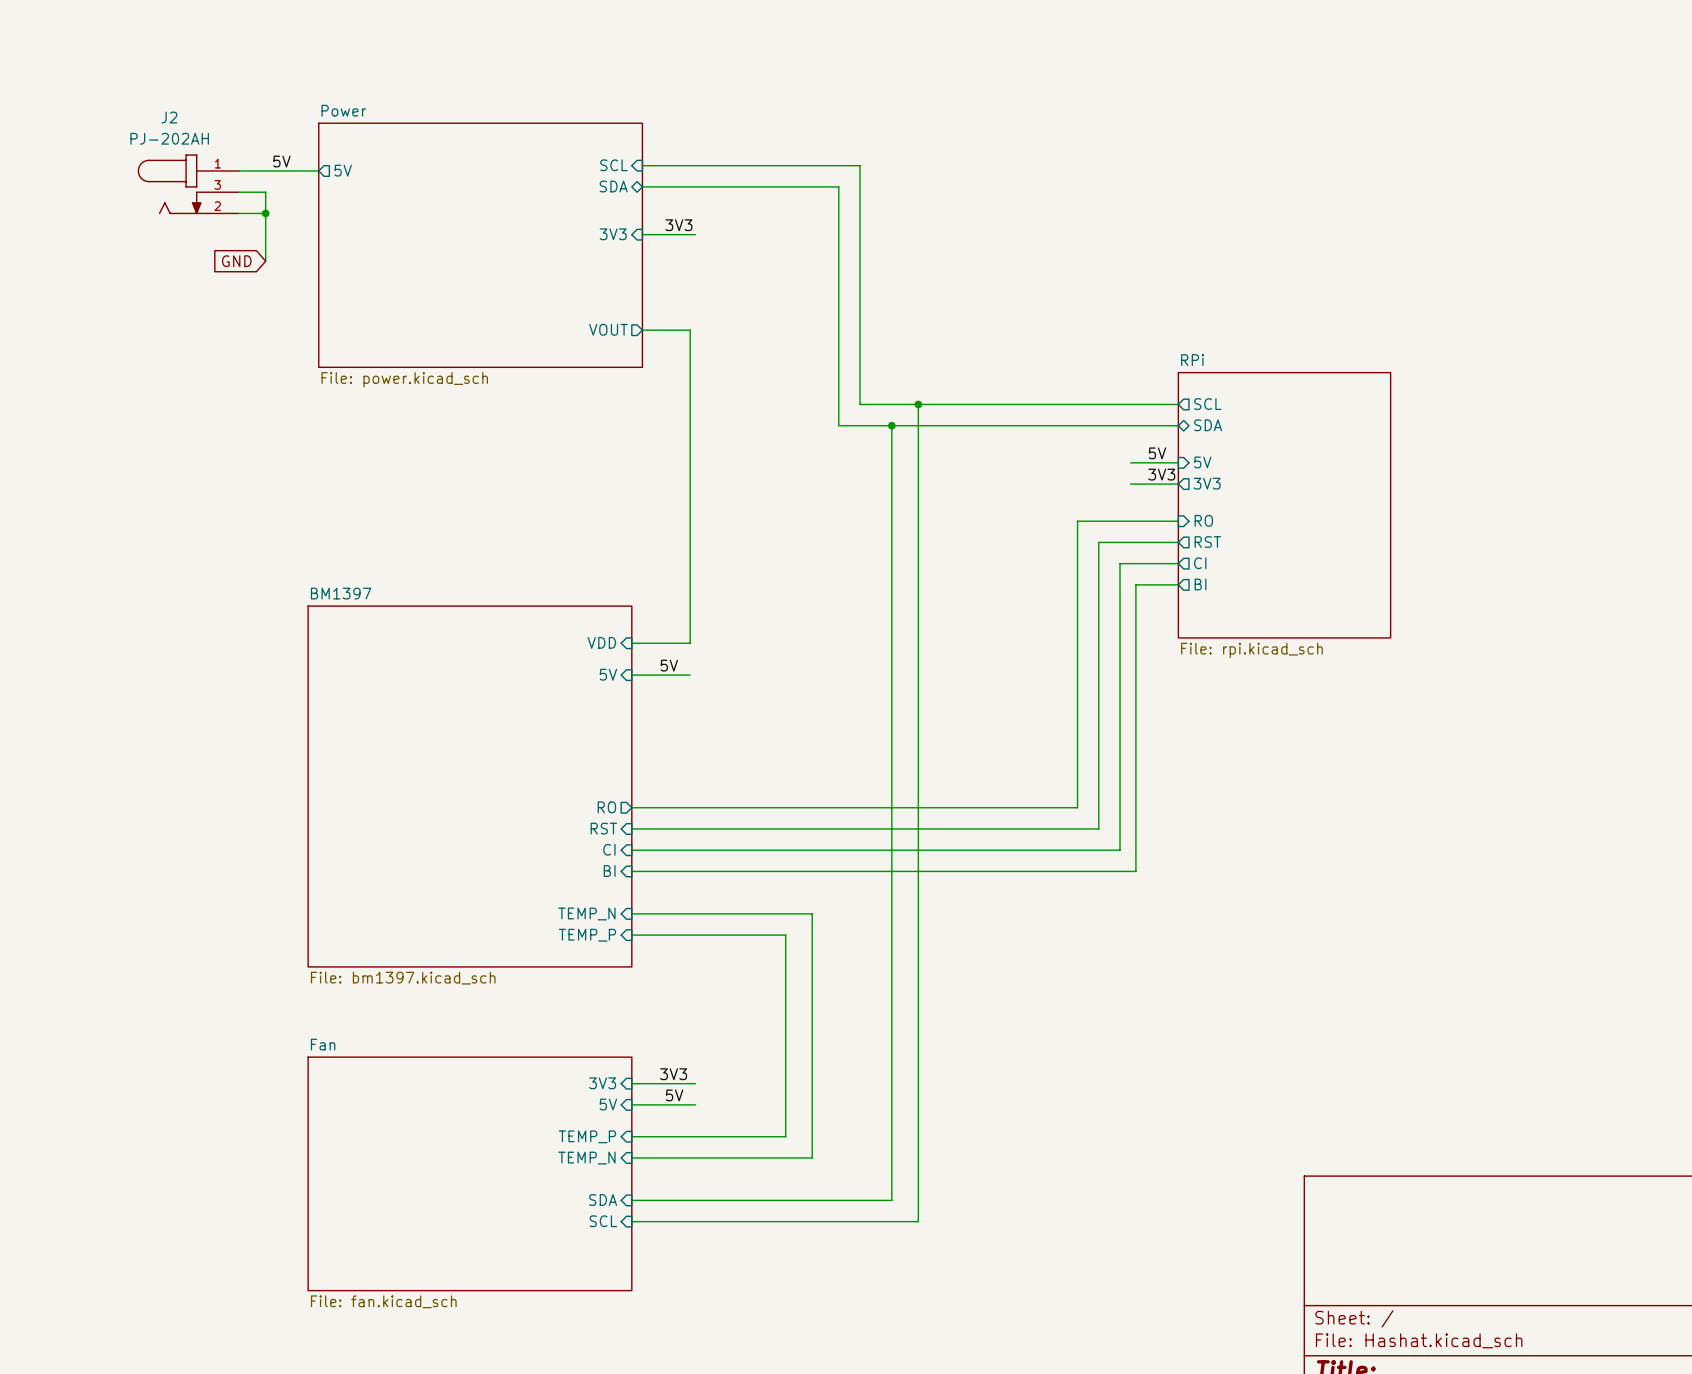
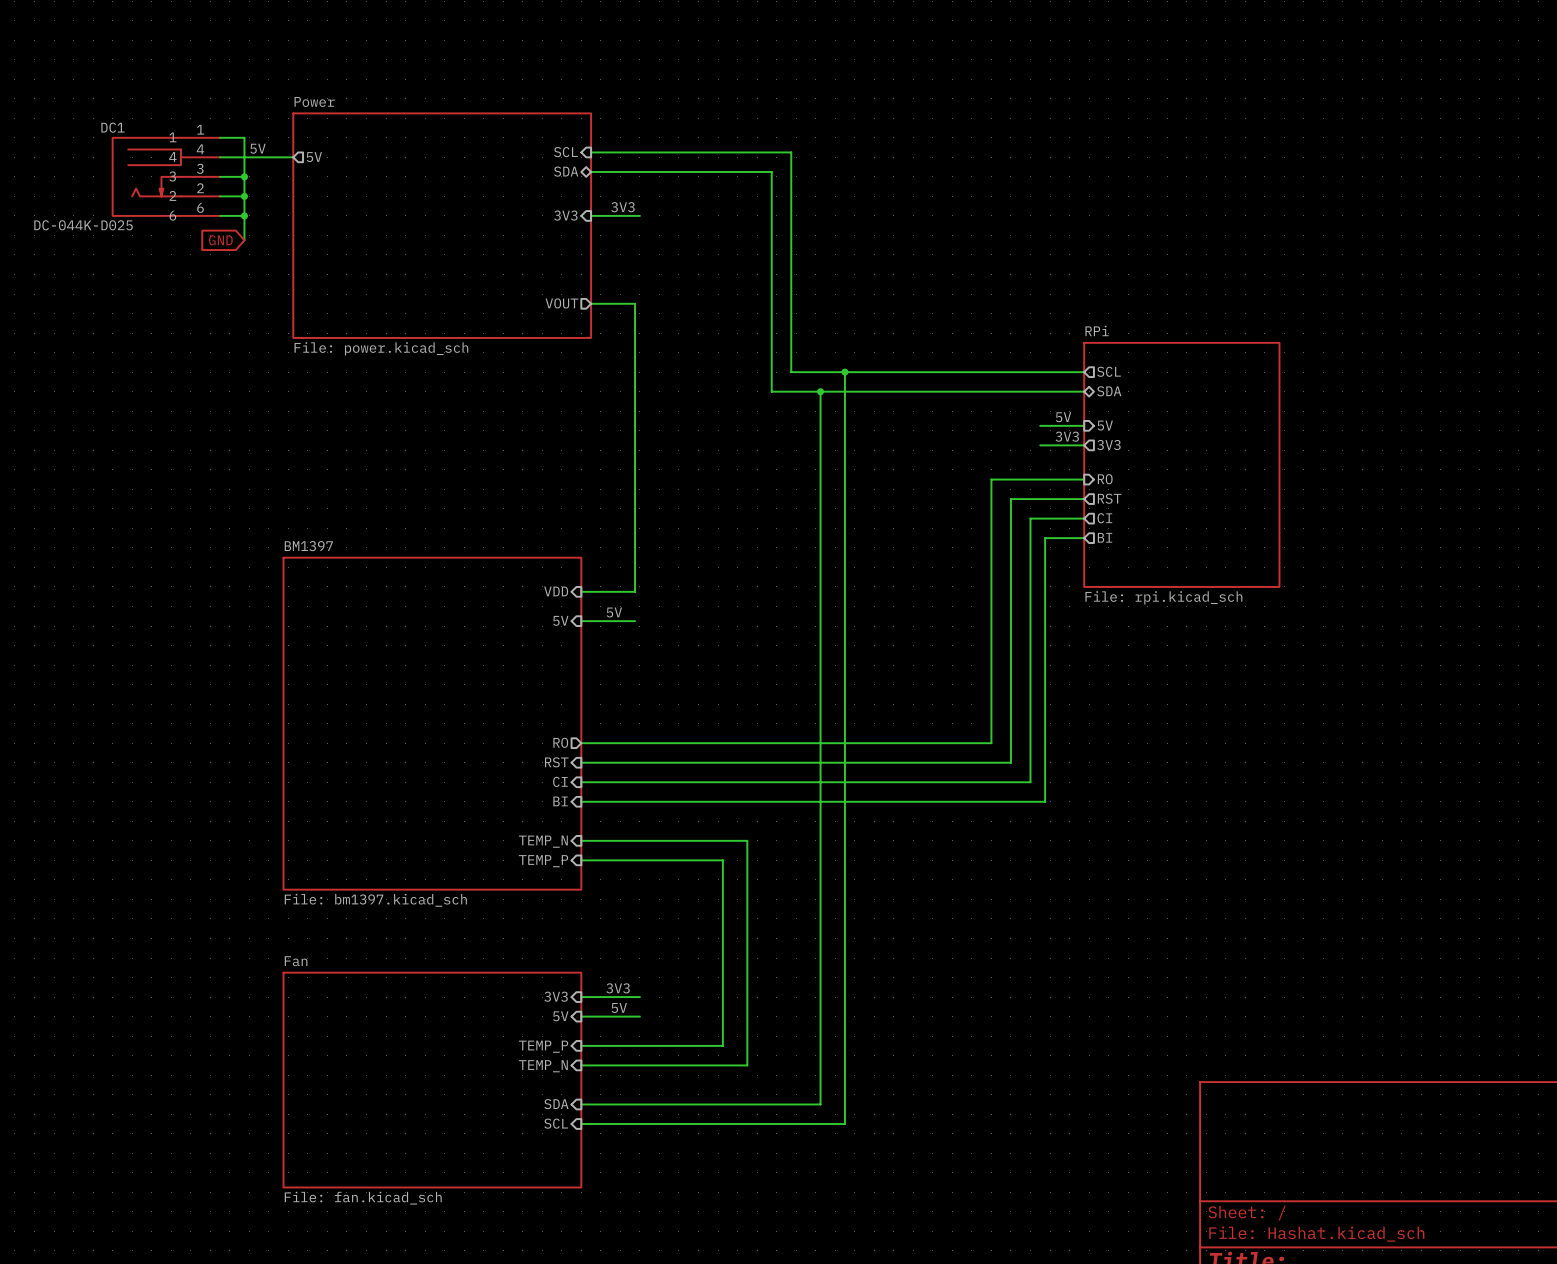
wire: none -> (220, 137) (244, 137) (244, 176)
J2: PJ-202AH (188, 184) -> none
DC1: none -> DC-044K-D025 (166, 176)
junction: none -> (244, 176)
wire: none -> (220, 215) (244, 215)
junction: none -> (244, 215)

